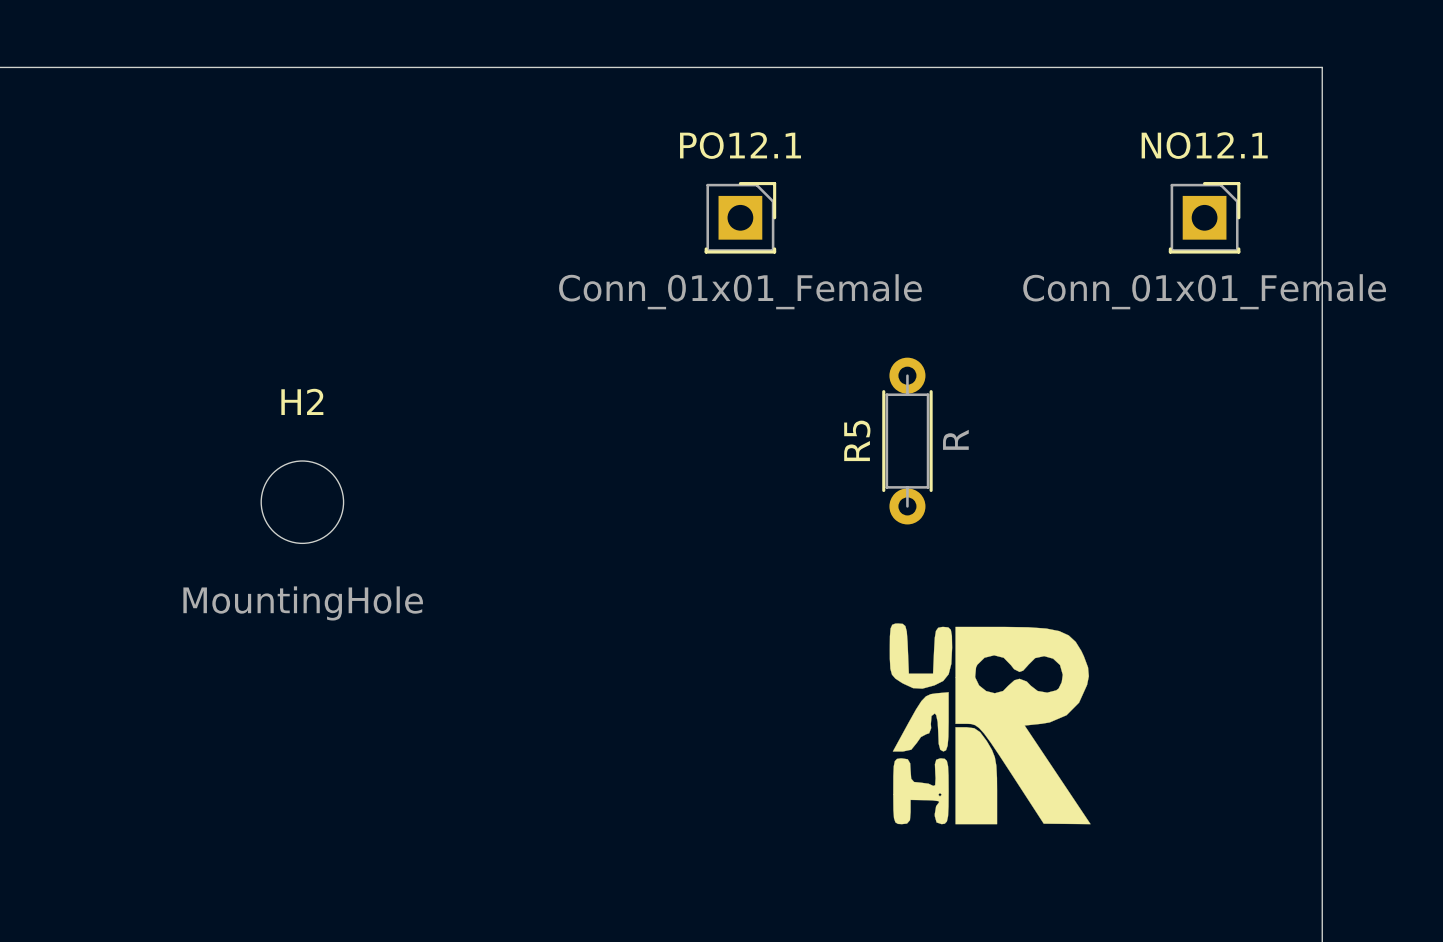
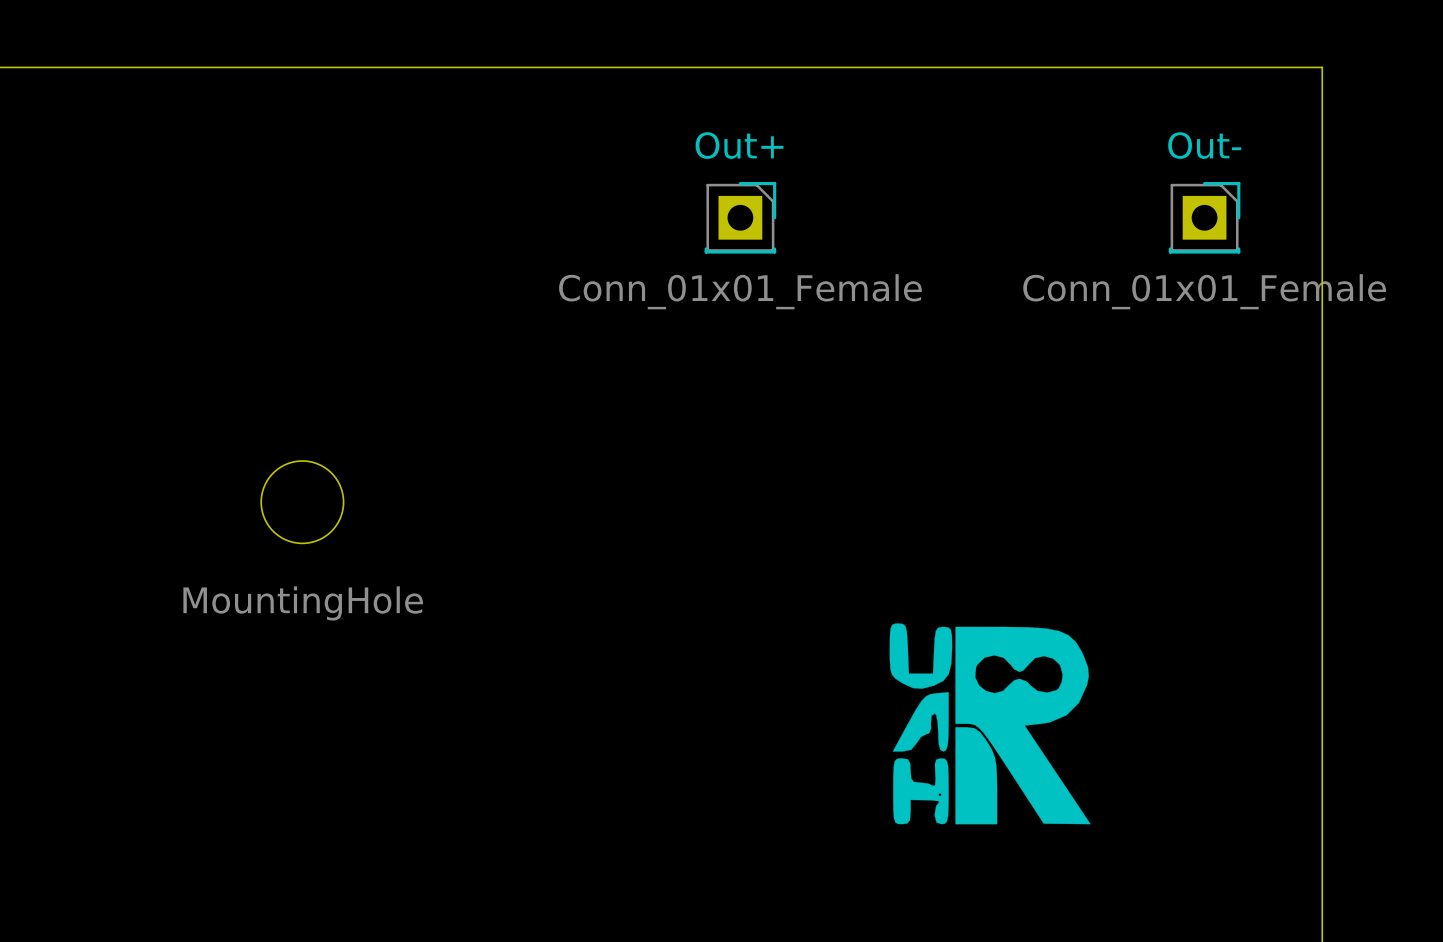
PO12.1 name: PO12.1 (740, 145) -> Out+ (739, 145)
NO12.1 name: NO12.1 (1204, 145) -> Out- (1204, 145)
H2 name: H2 (302, 401) -> none
R5: R (907, 441) -> none

